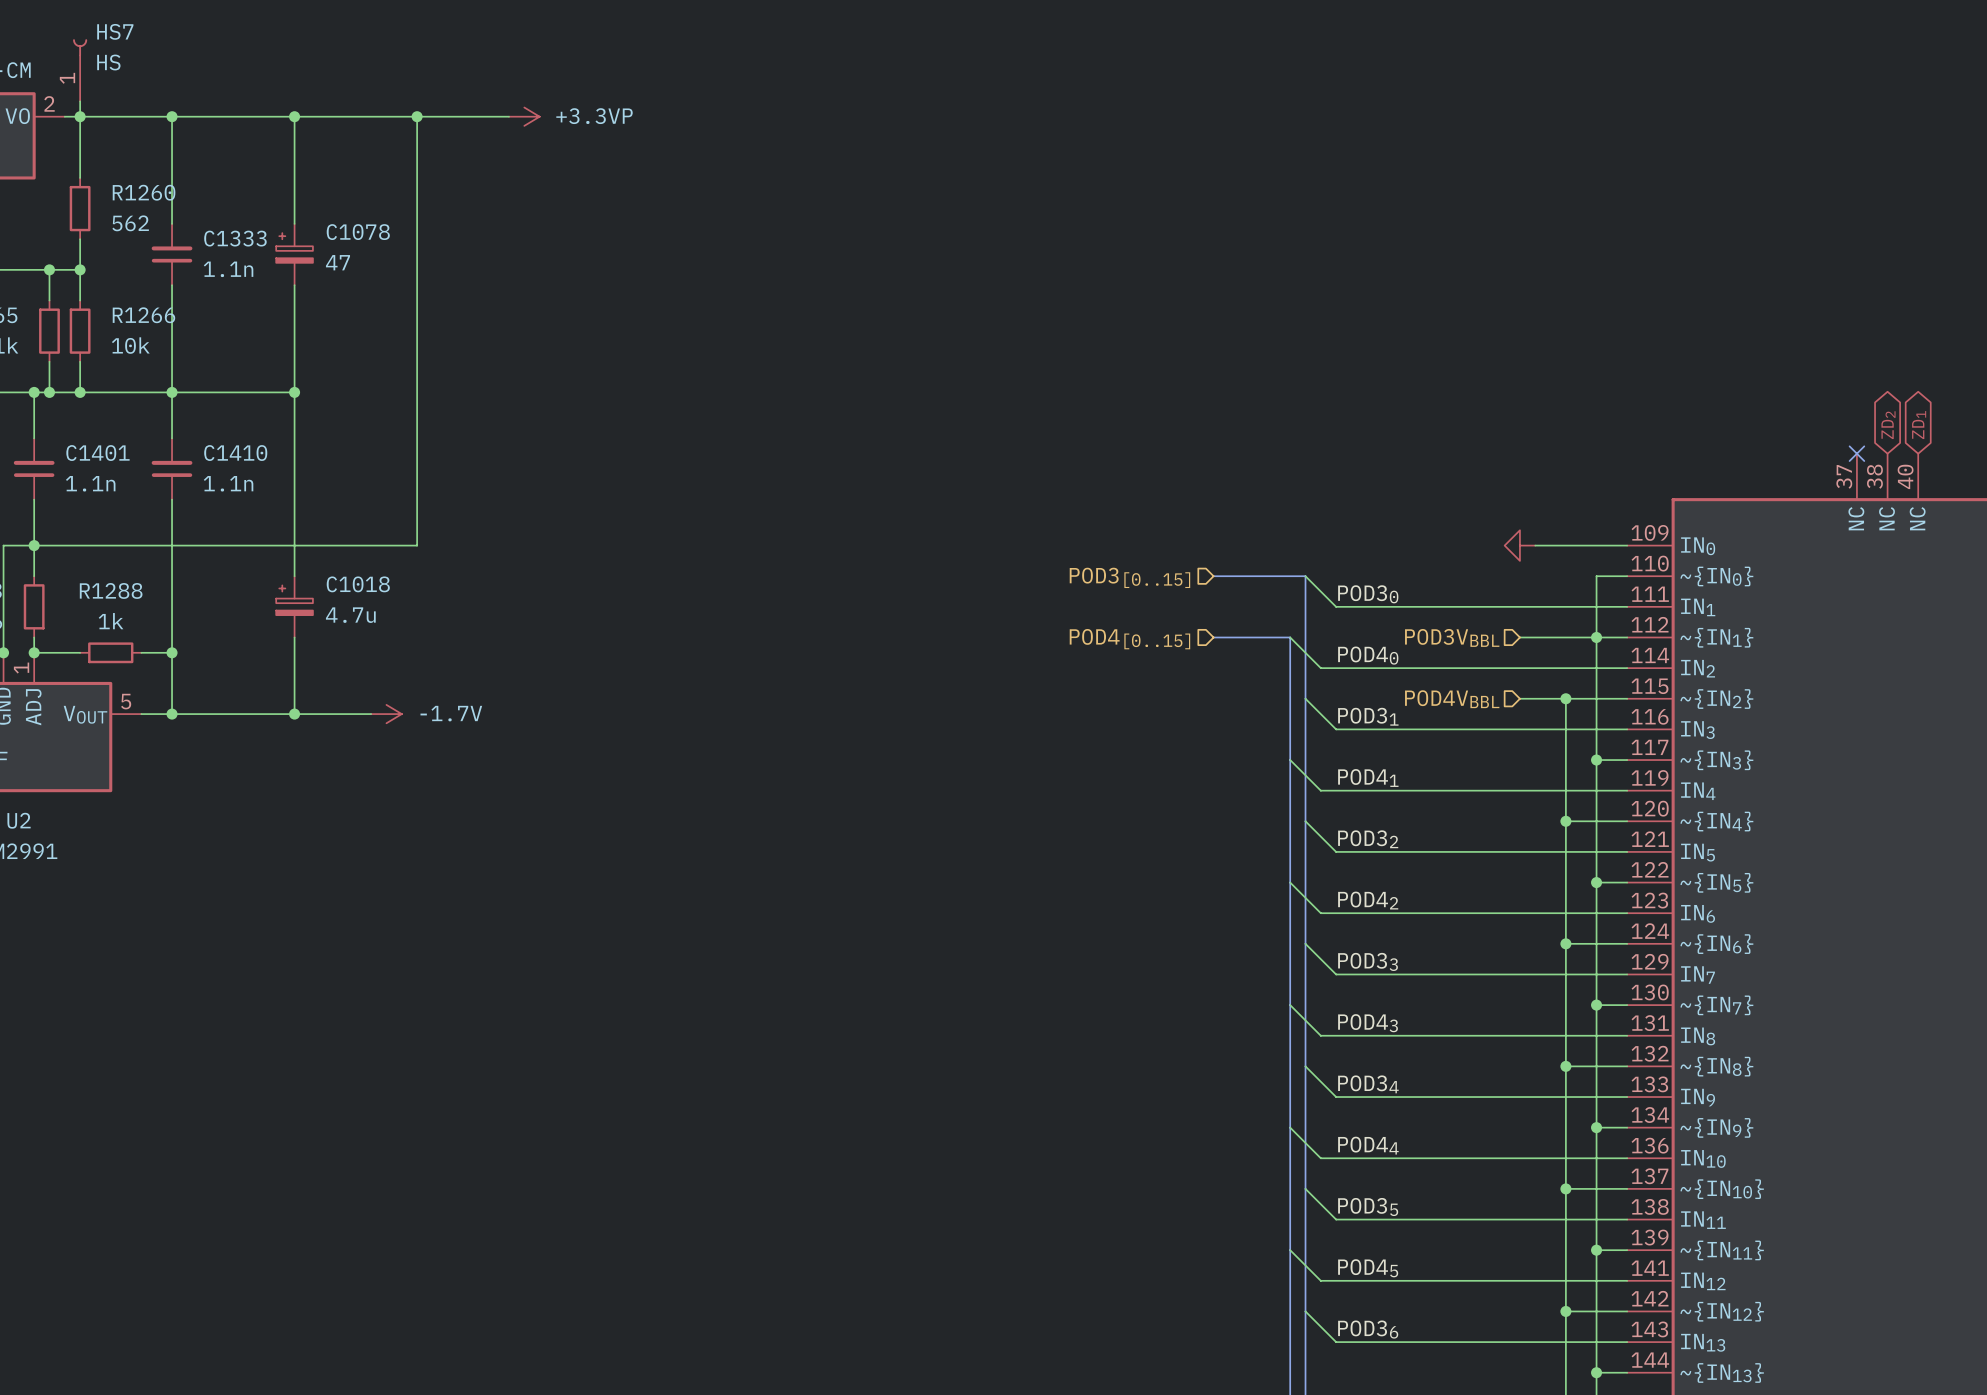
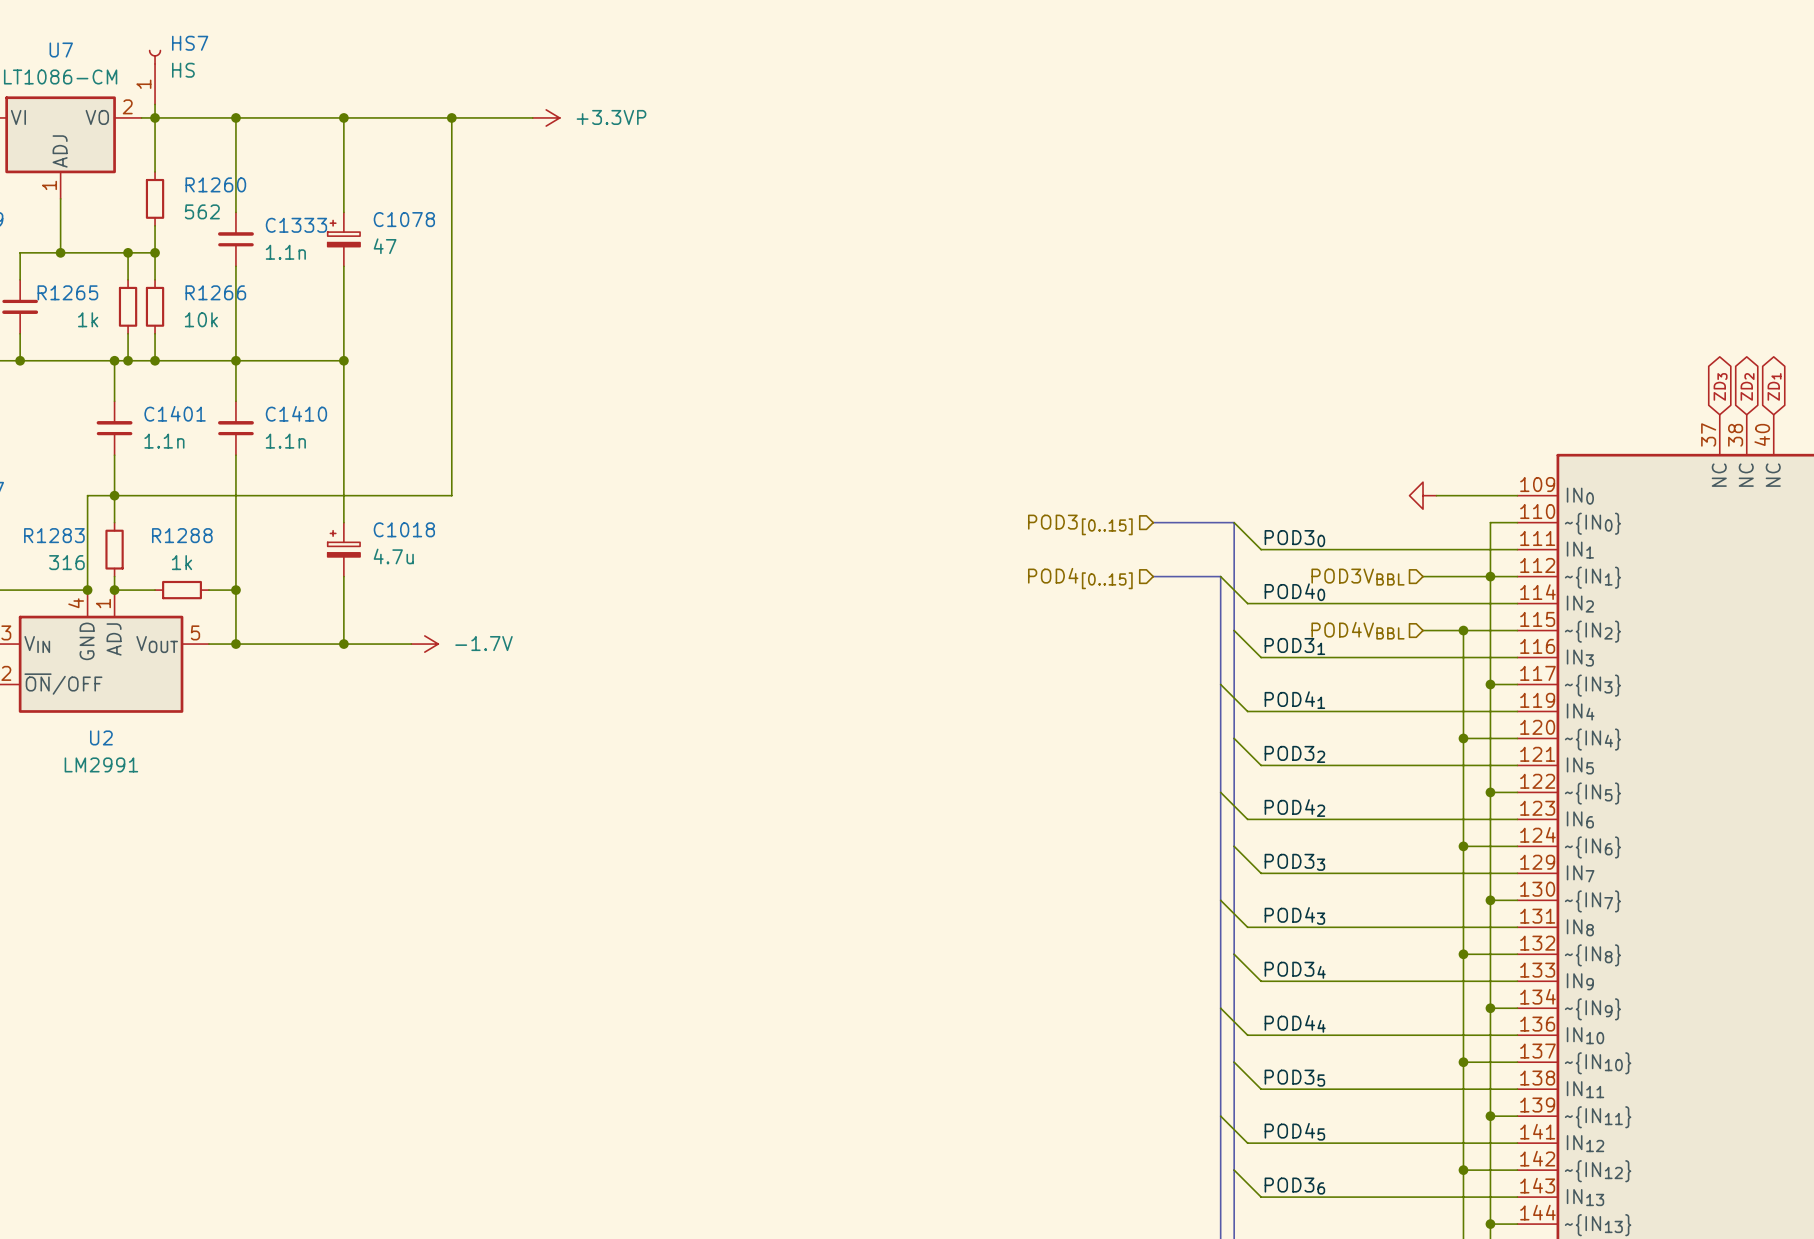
global label: none -> ZD3 (1720, 386)
no-connect mark: (1856, 453) -> none

